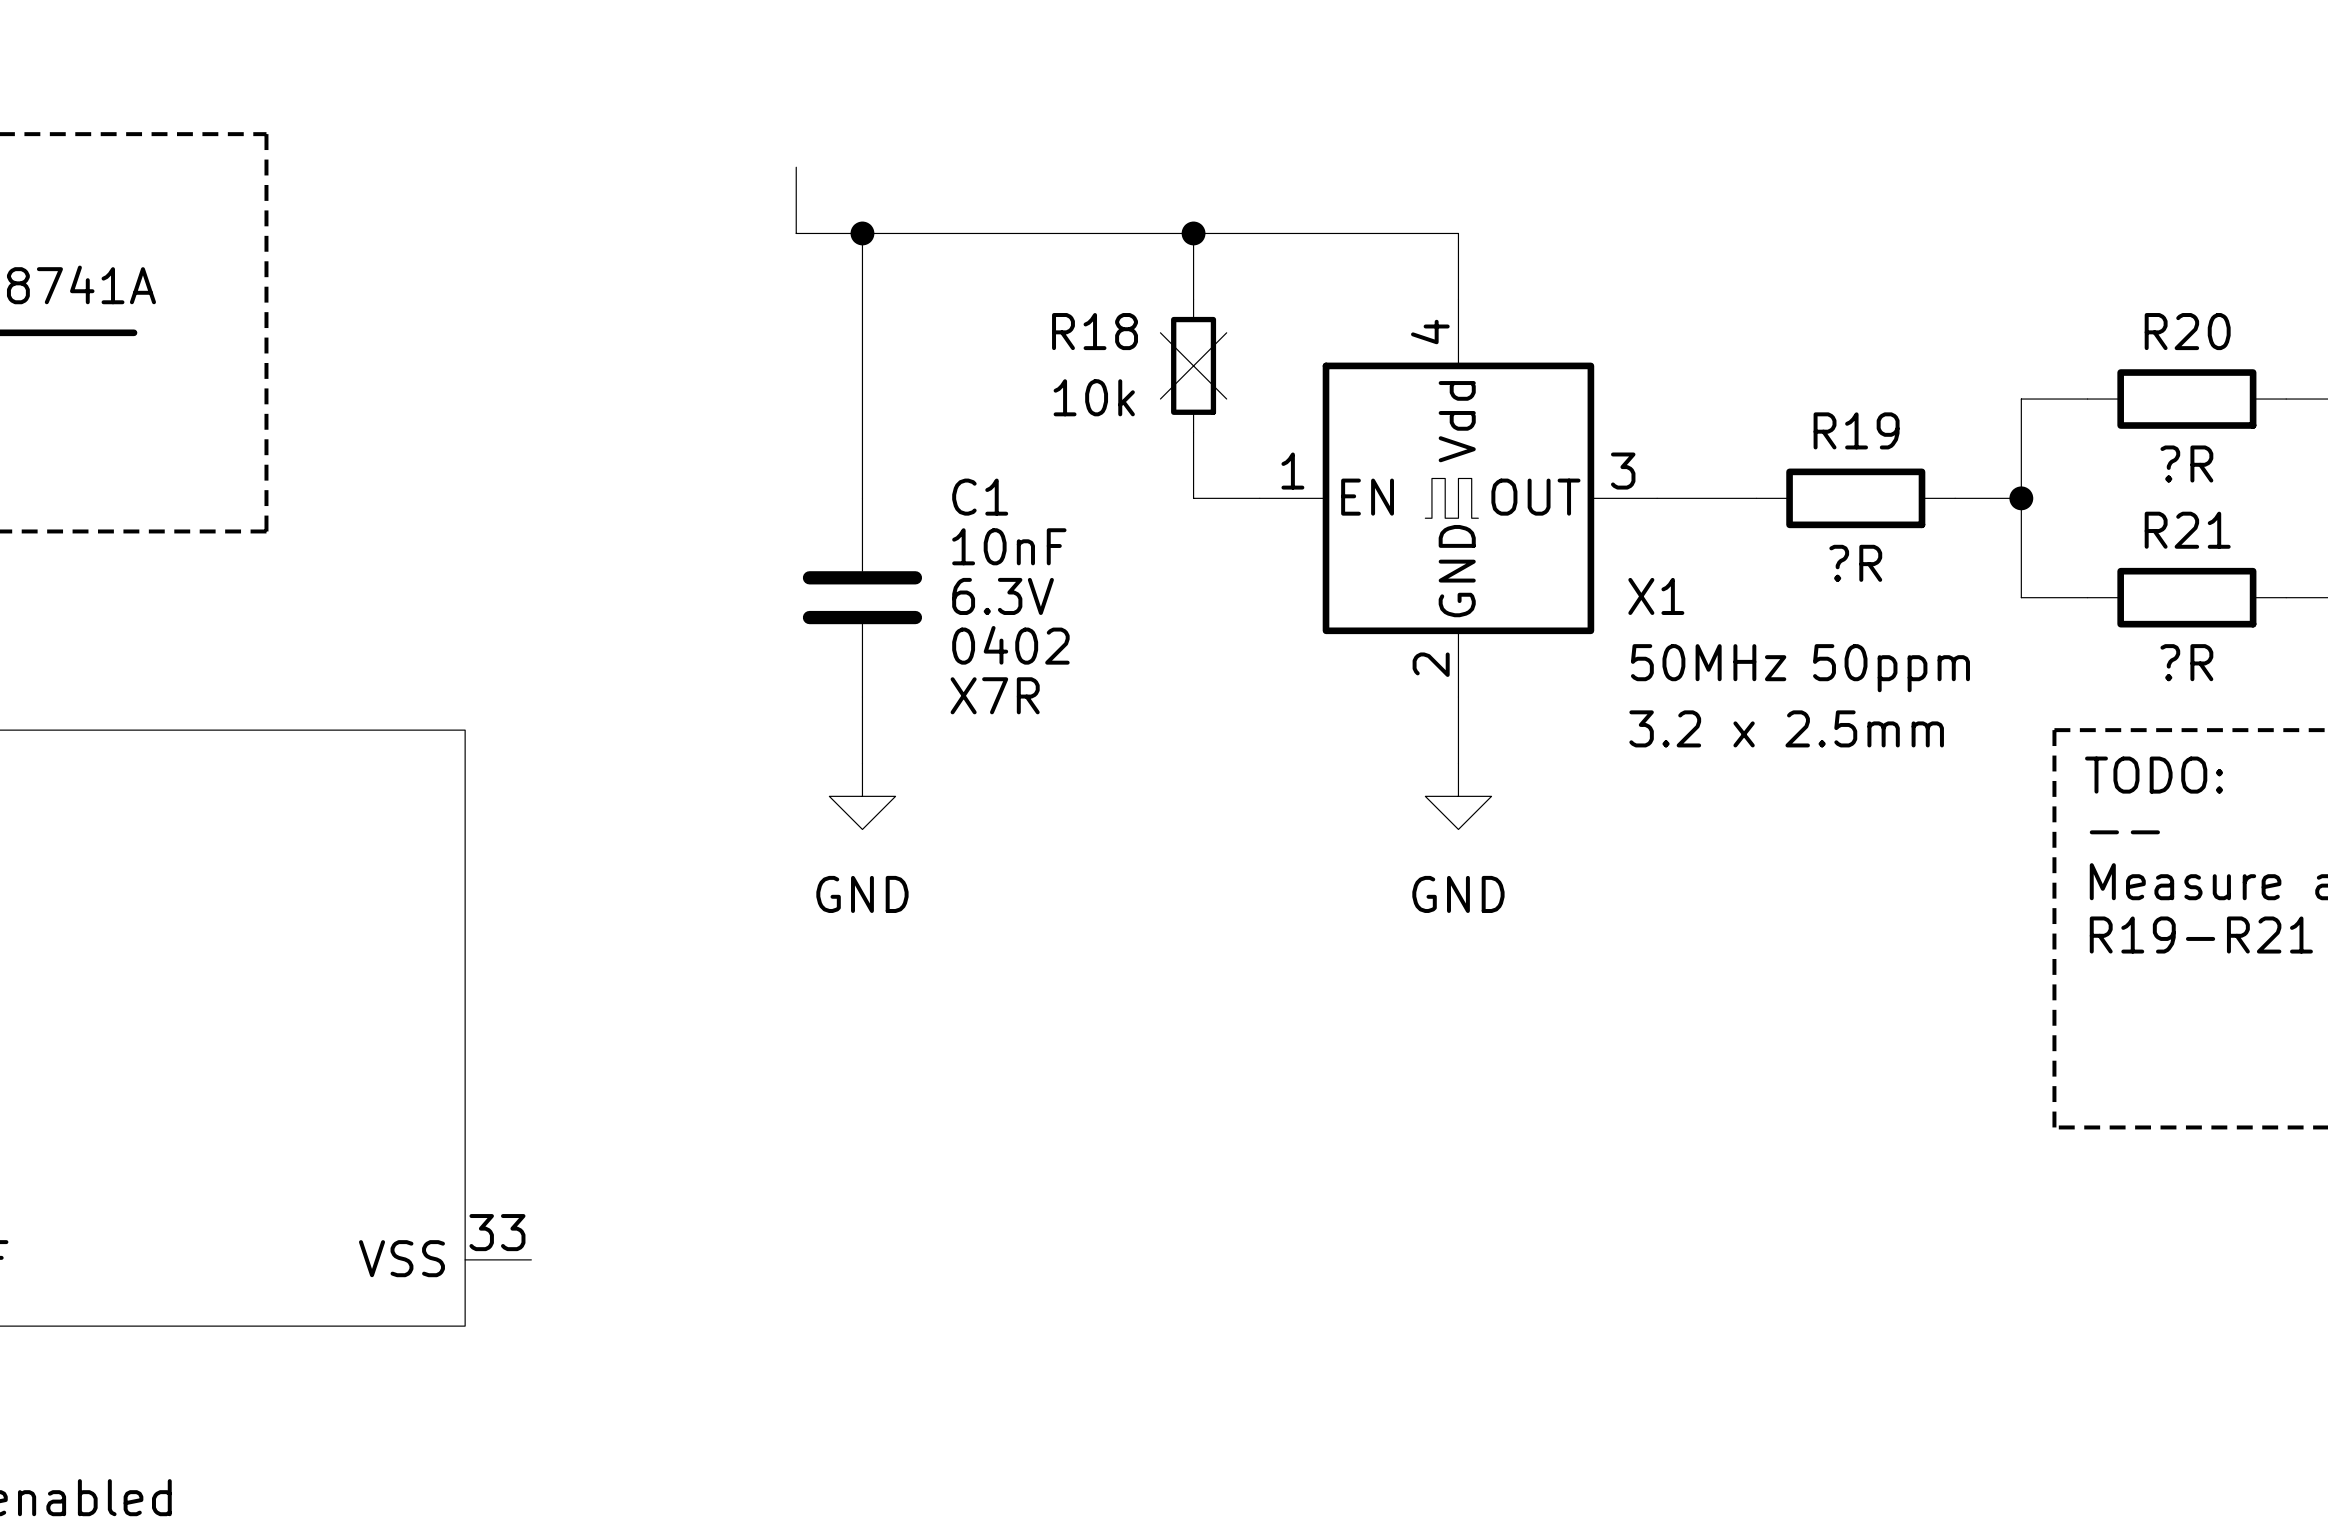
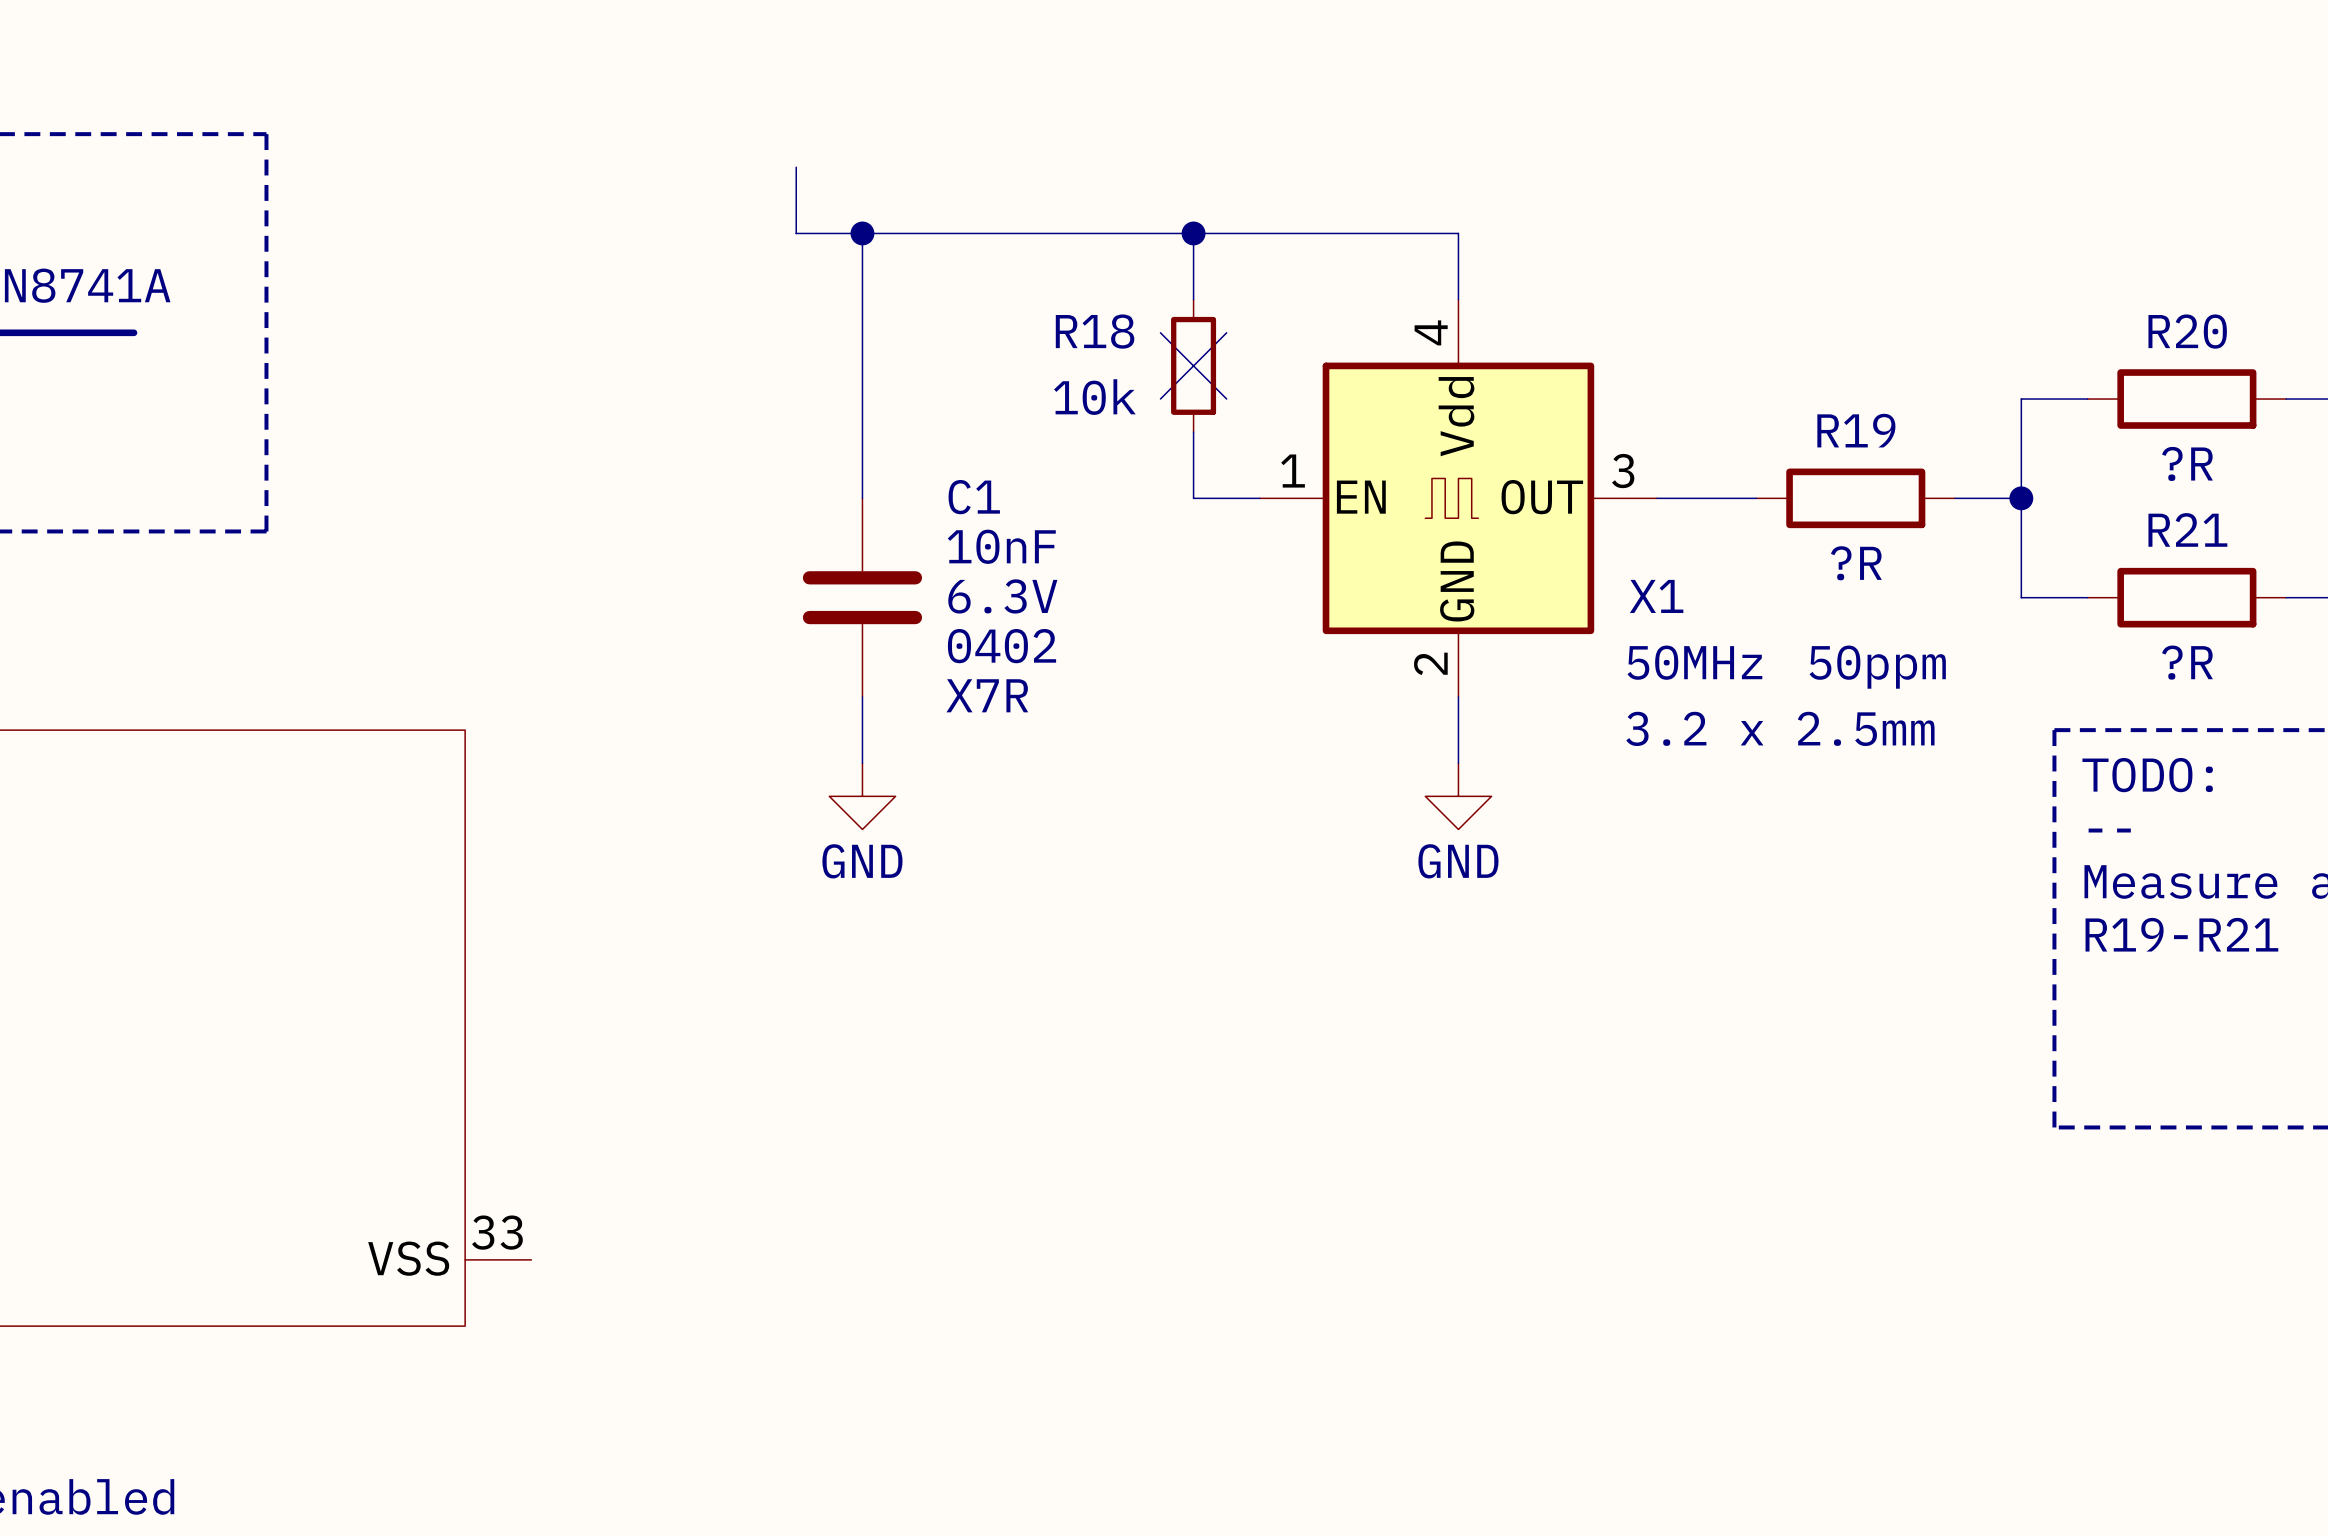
power symbol text position: GND (862, 894) -> GND (862, 861)
power symbol text position: GND (1458, 894) -> GND (1458, 861)

